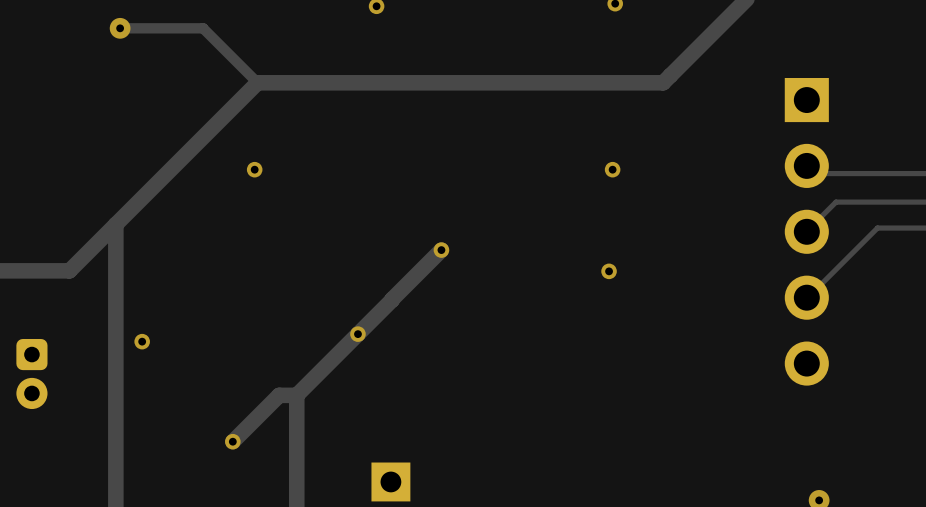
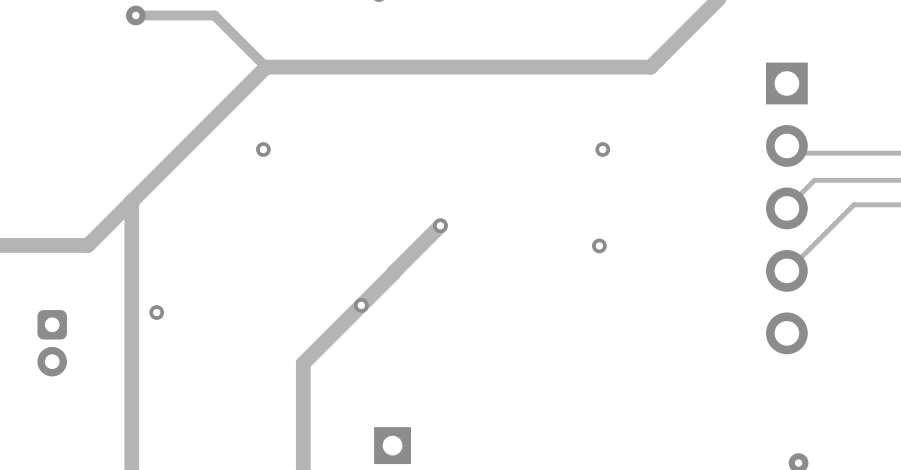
track: (296, 395) (279, 395) (232, 441) -> none
via: (232, 441) -> none

